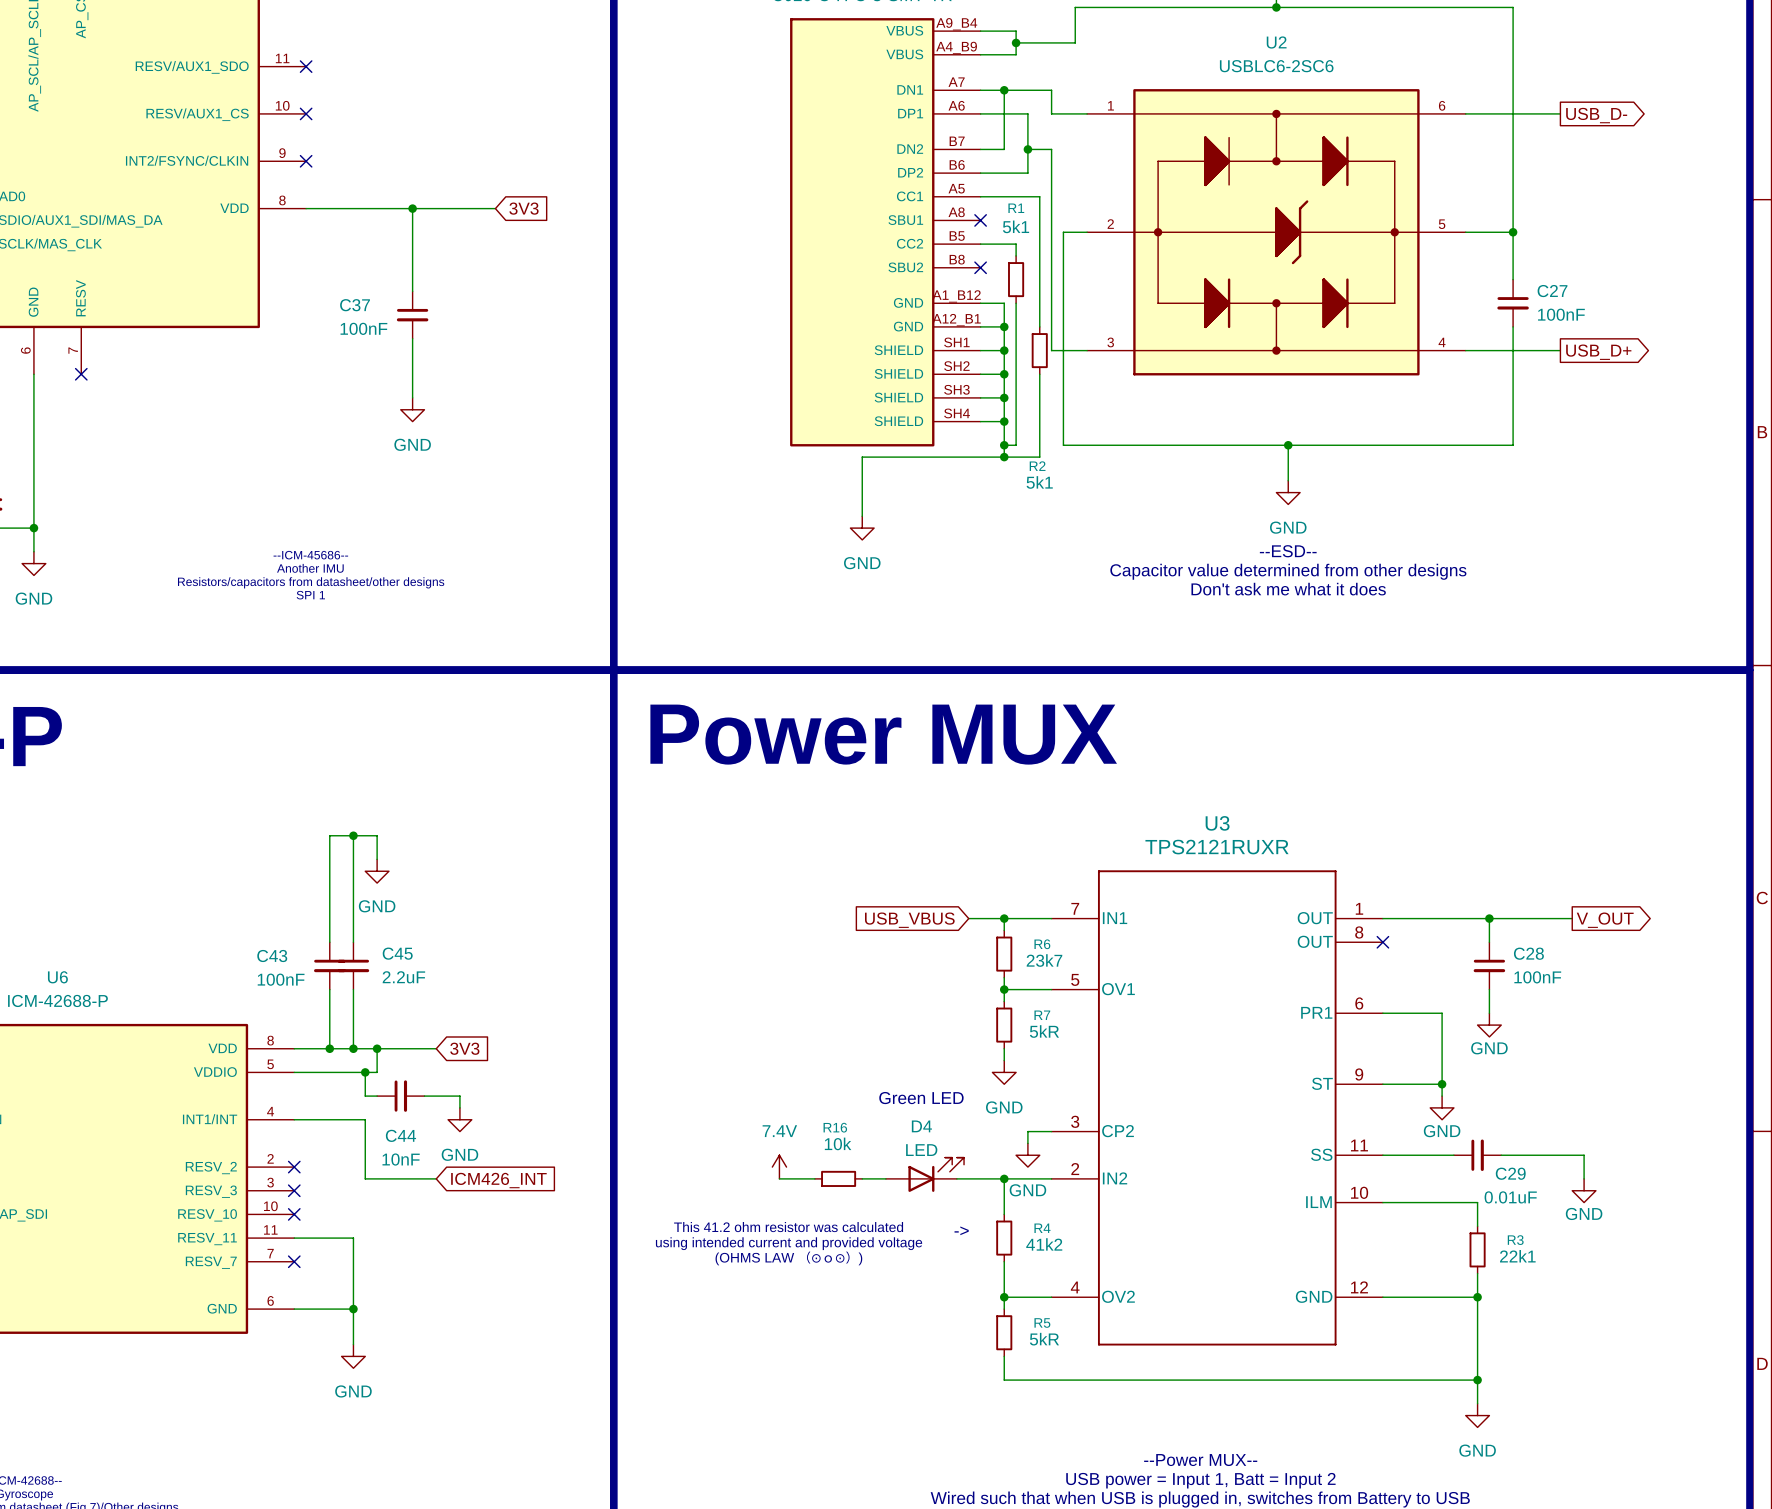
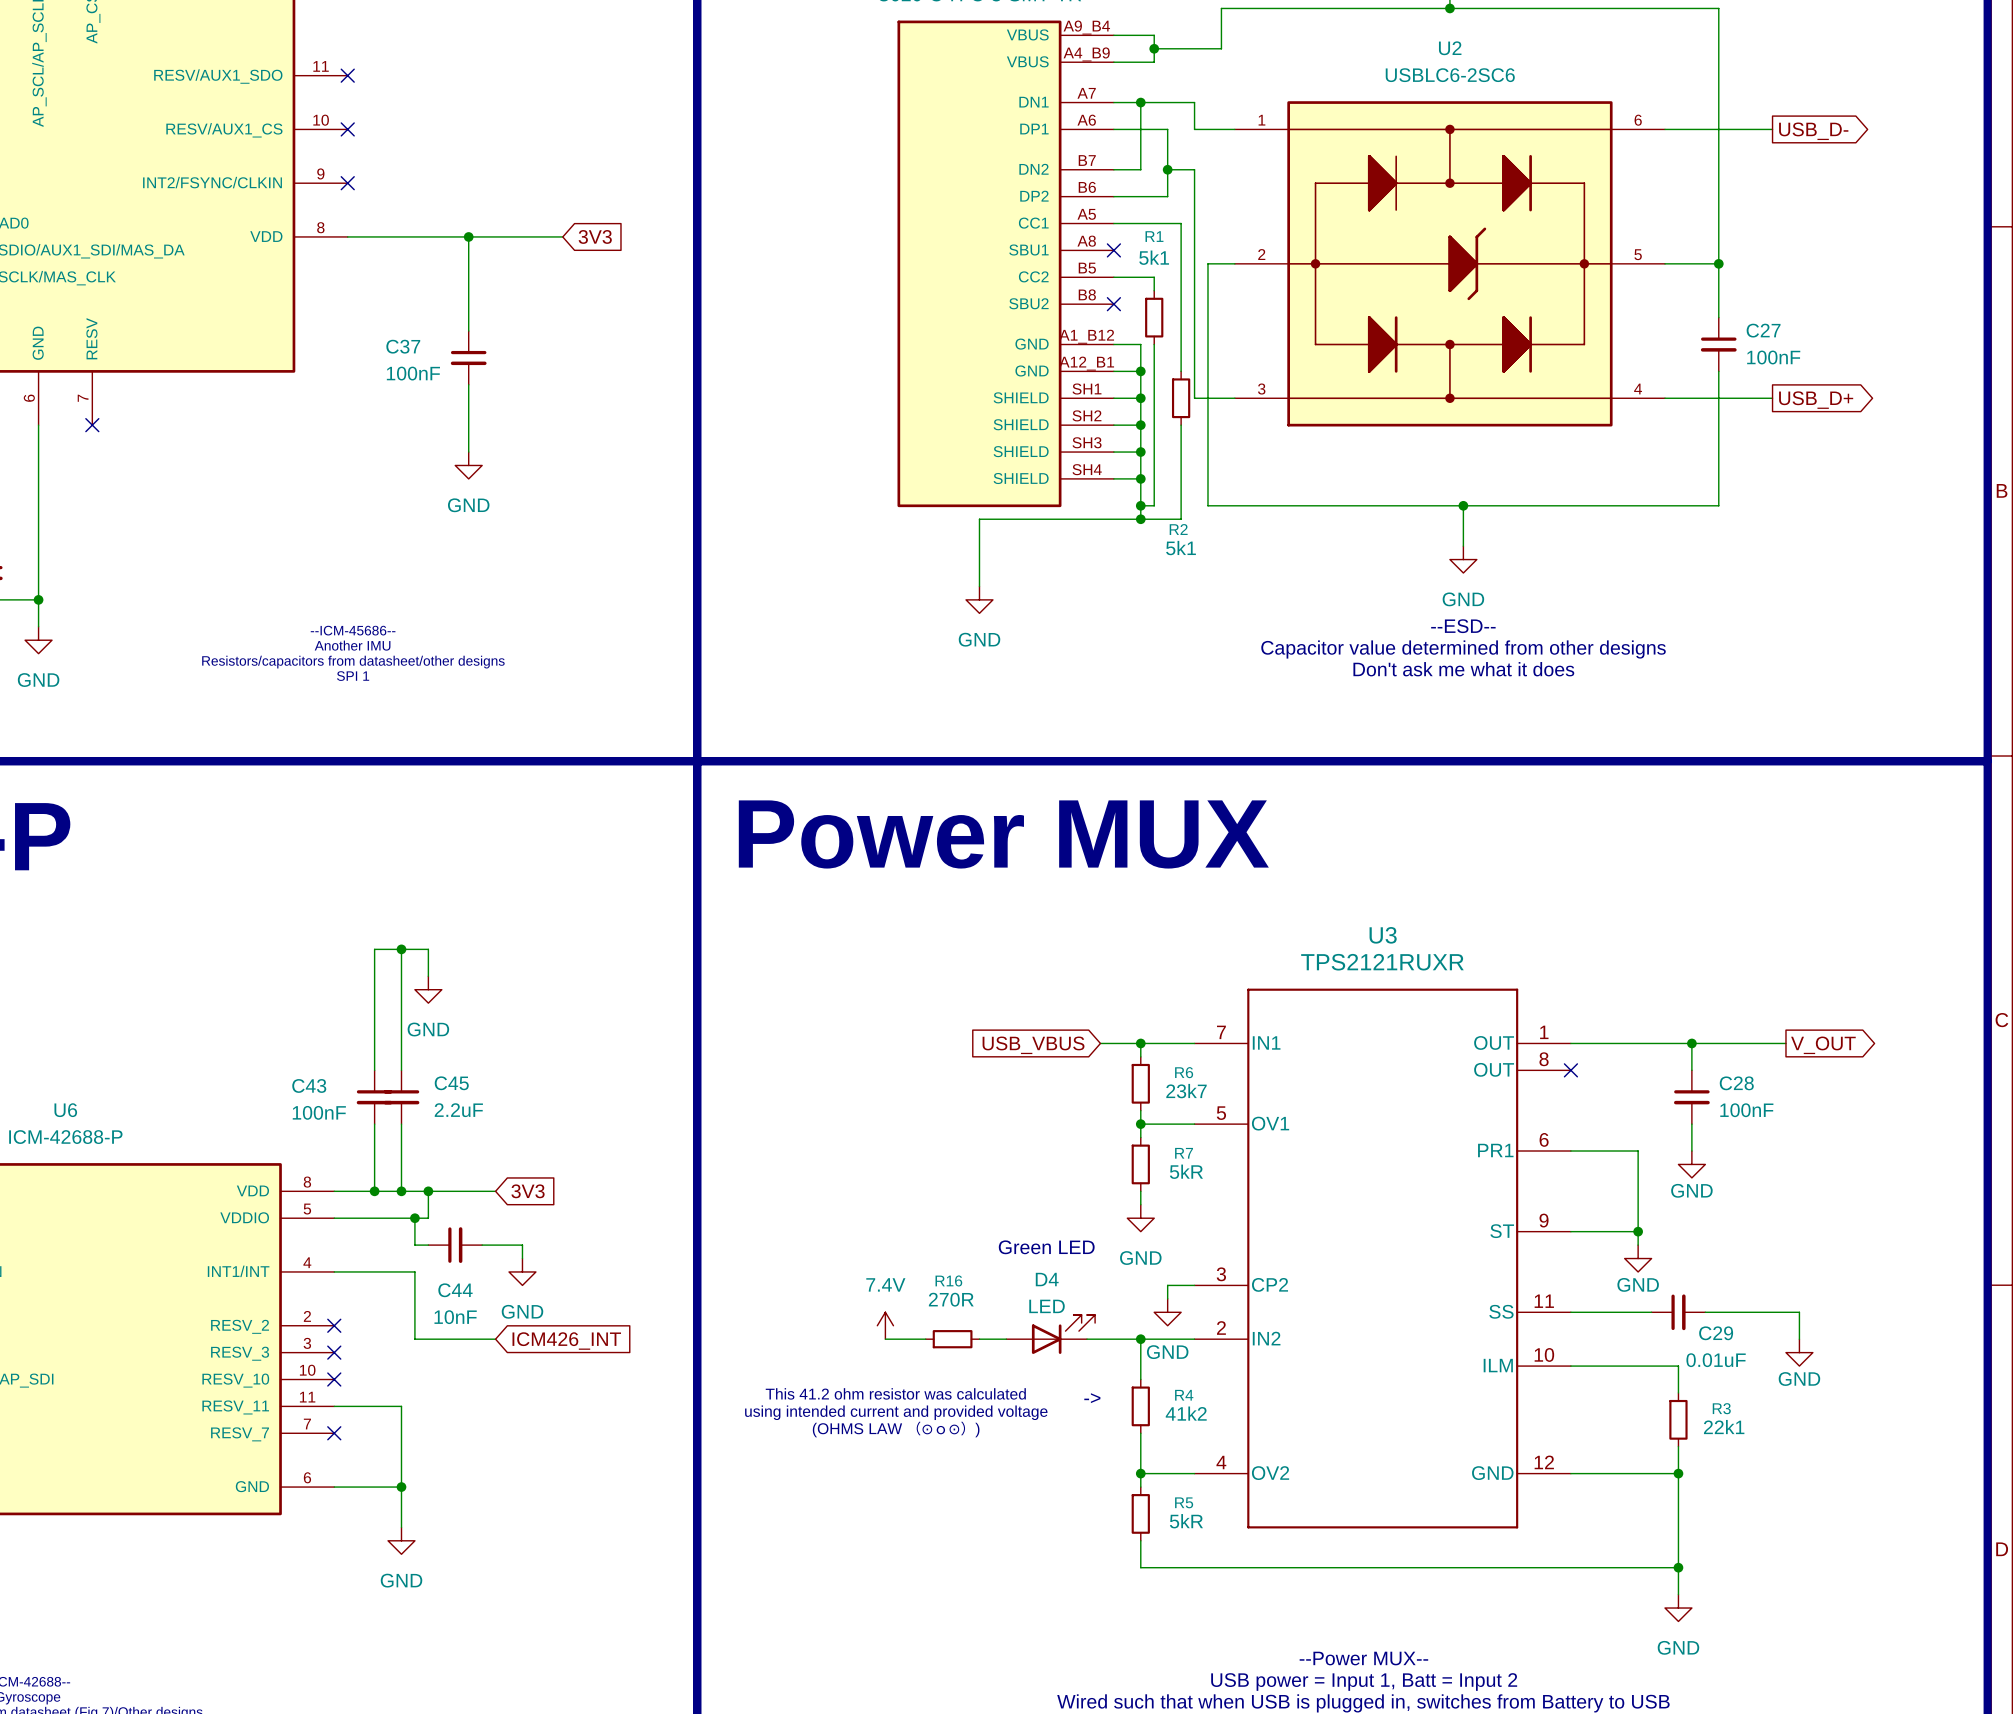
R16 value: 10k (838, 1143) -> 270R (951, 1299)

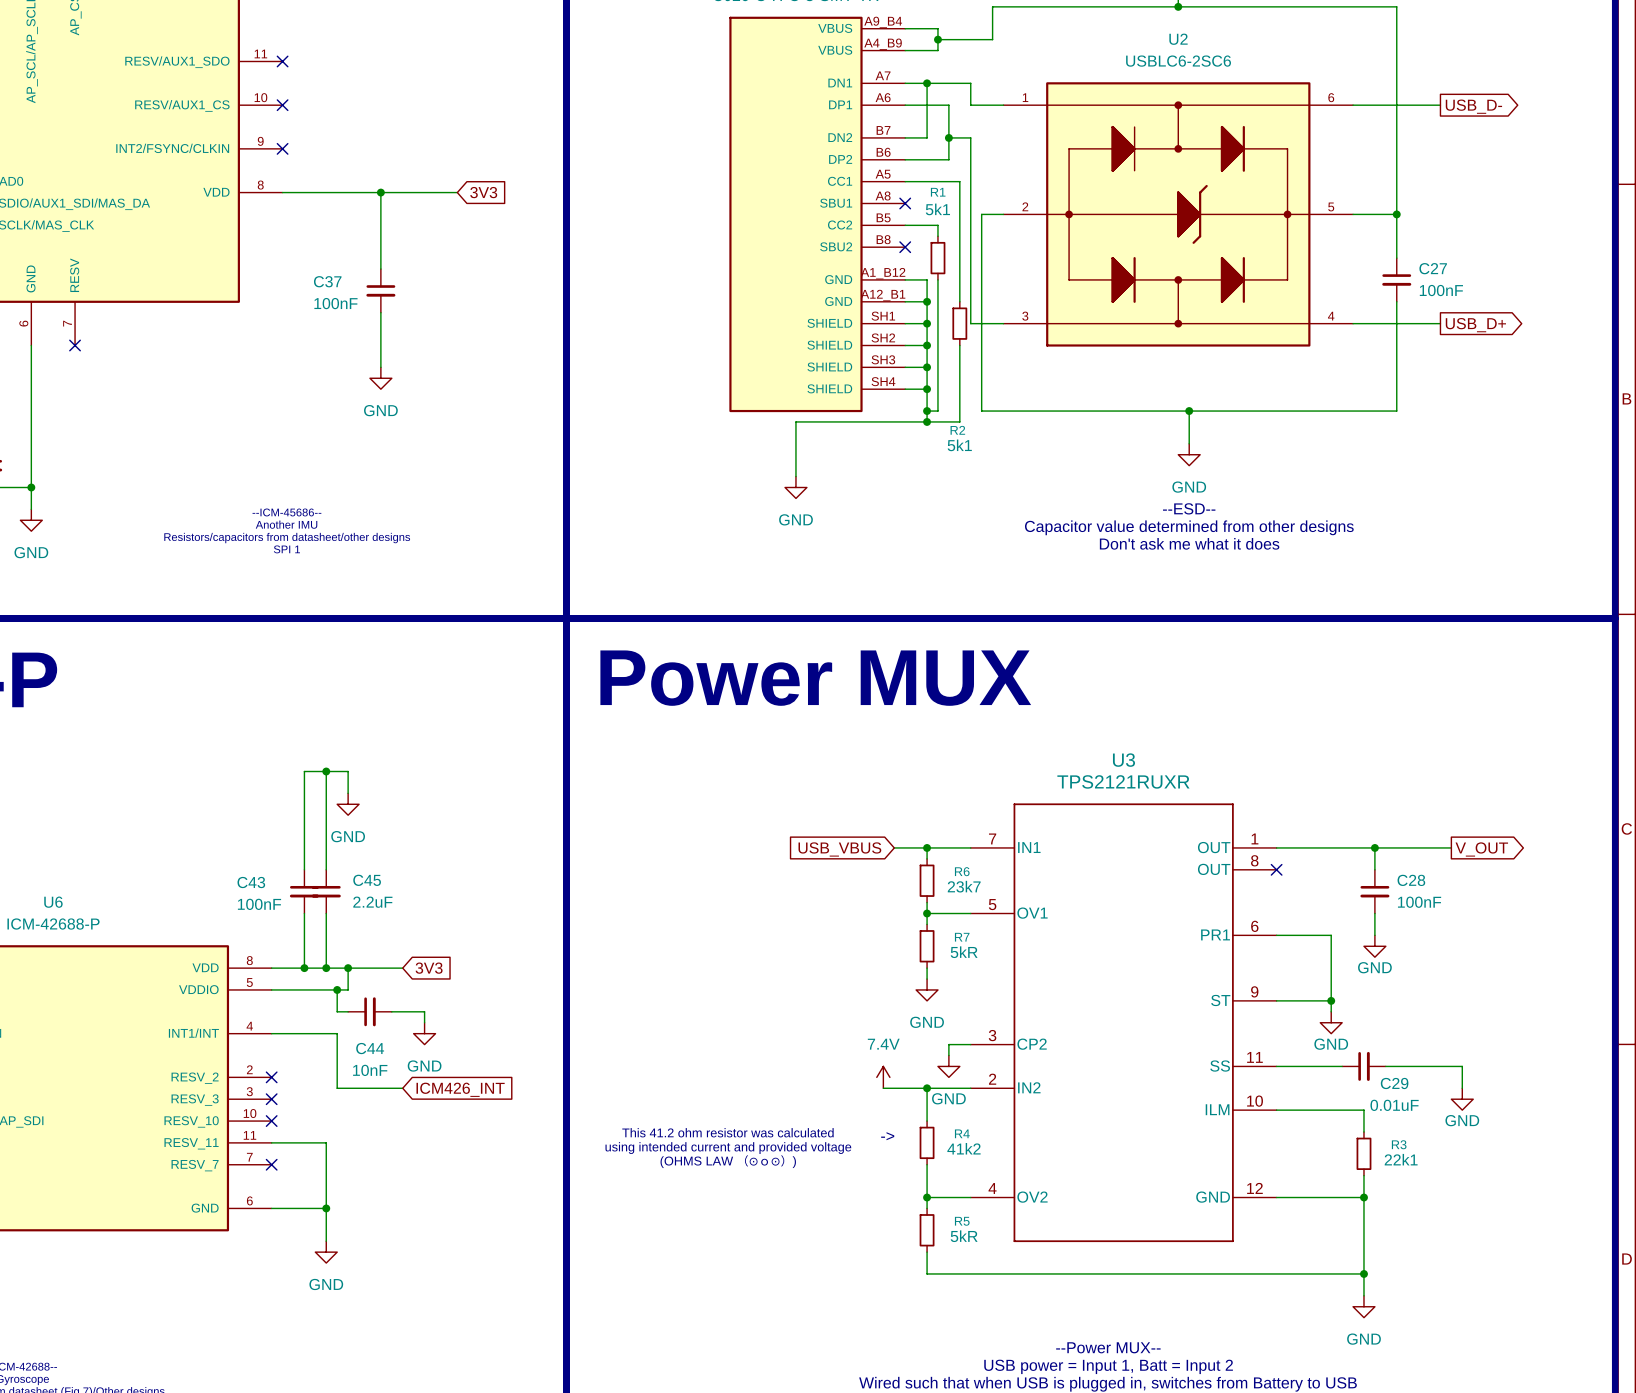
text: Green LED (1046, 1247) -> none
power symbol position: 7.4V (885, 1325) -> 7.4V (883, 1077)
D4: LED (1050, 1334) -> none
wire: (885, 1339) (925, 1339) -> none
R16: 270R (952, 1339) -> none
wire: (979, 1339) (1006, 1339) -> none

